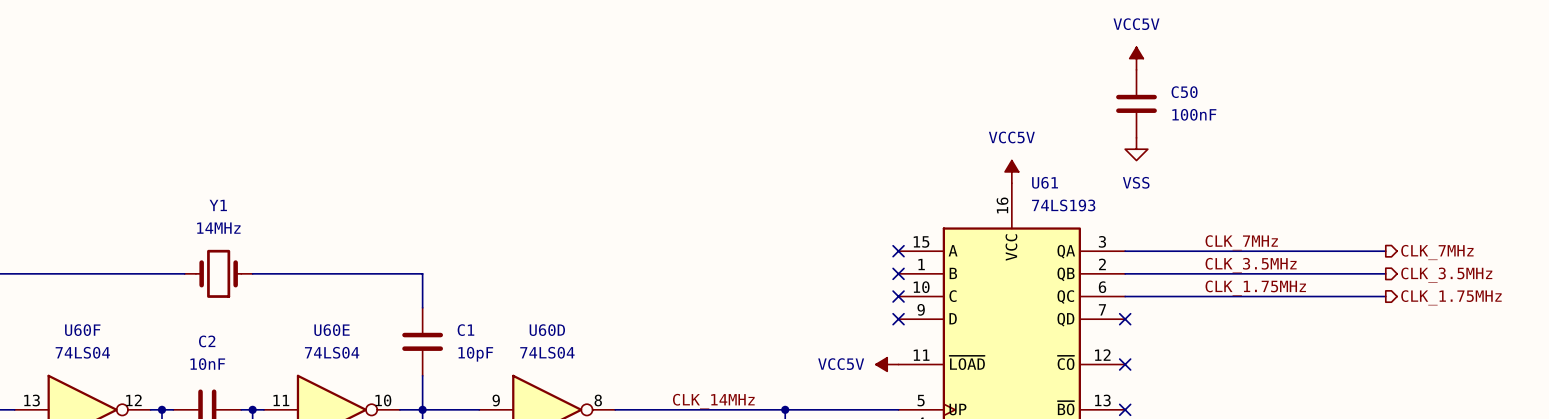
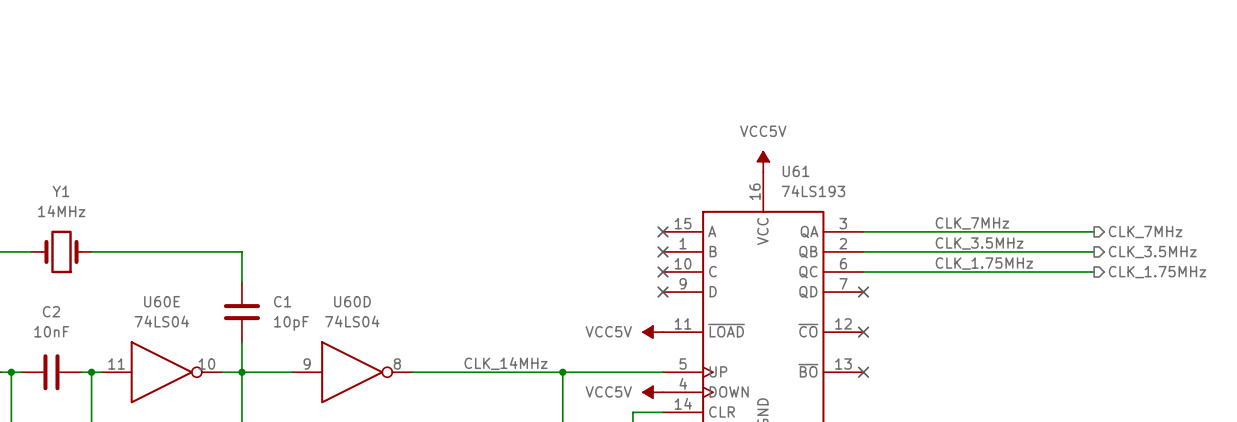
power symbol: VCC5V (1136, 58) -> none
C50: 100nF (1136, 103) -> none
power symbol: VSS (1136, 149) -> none

